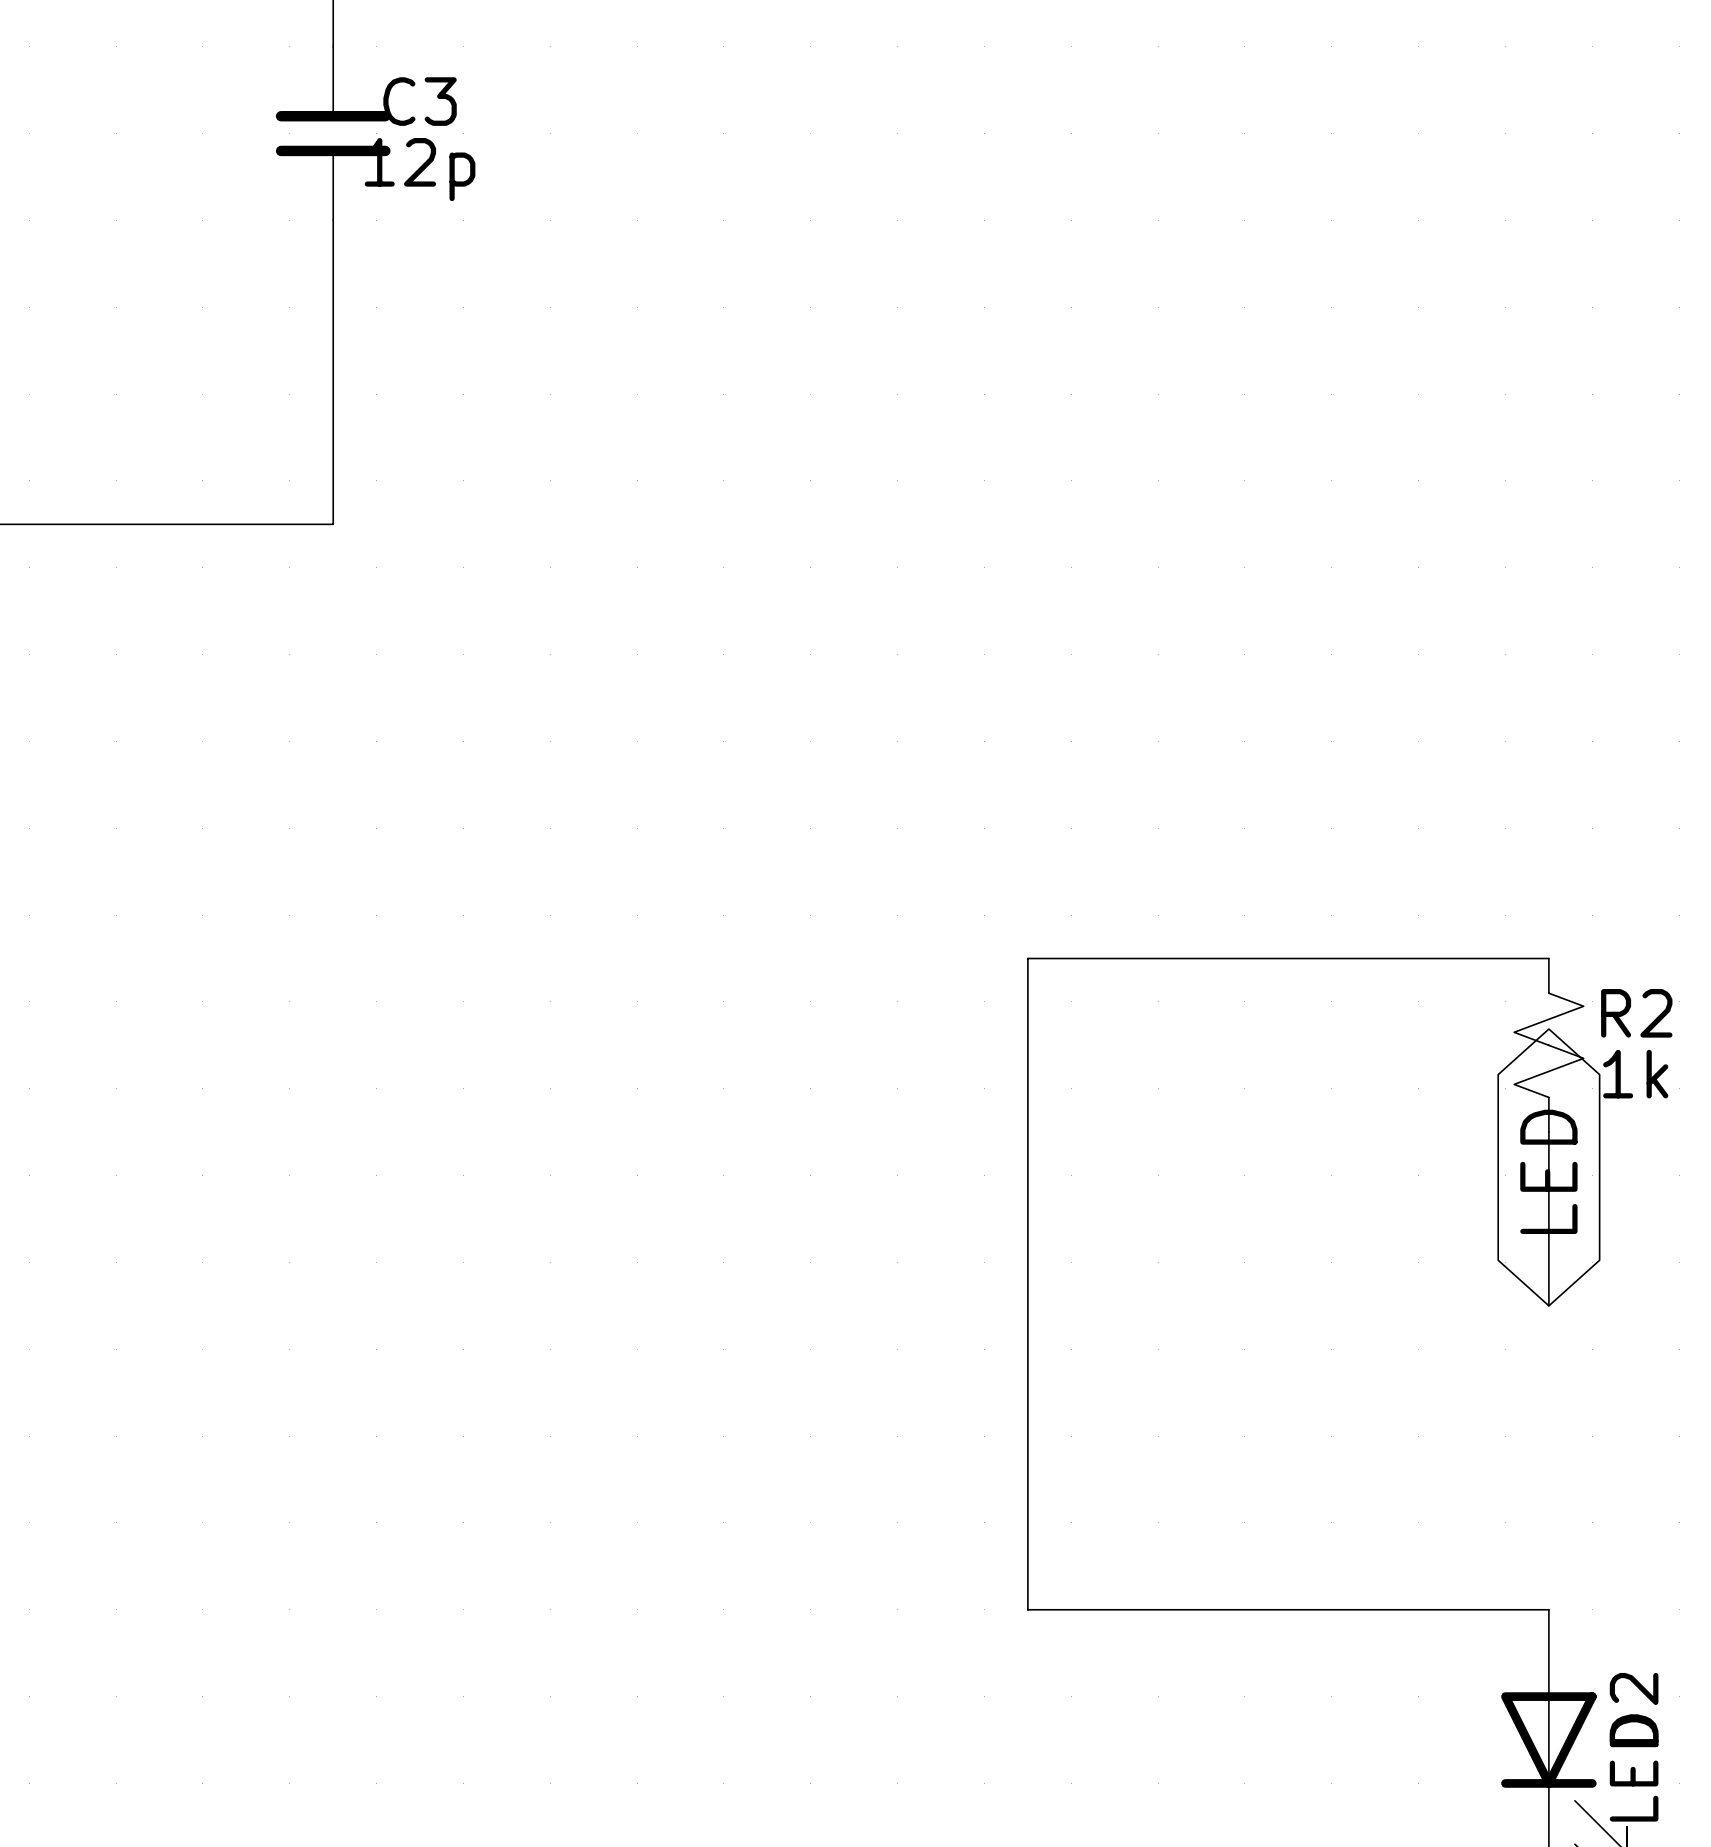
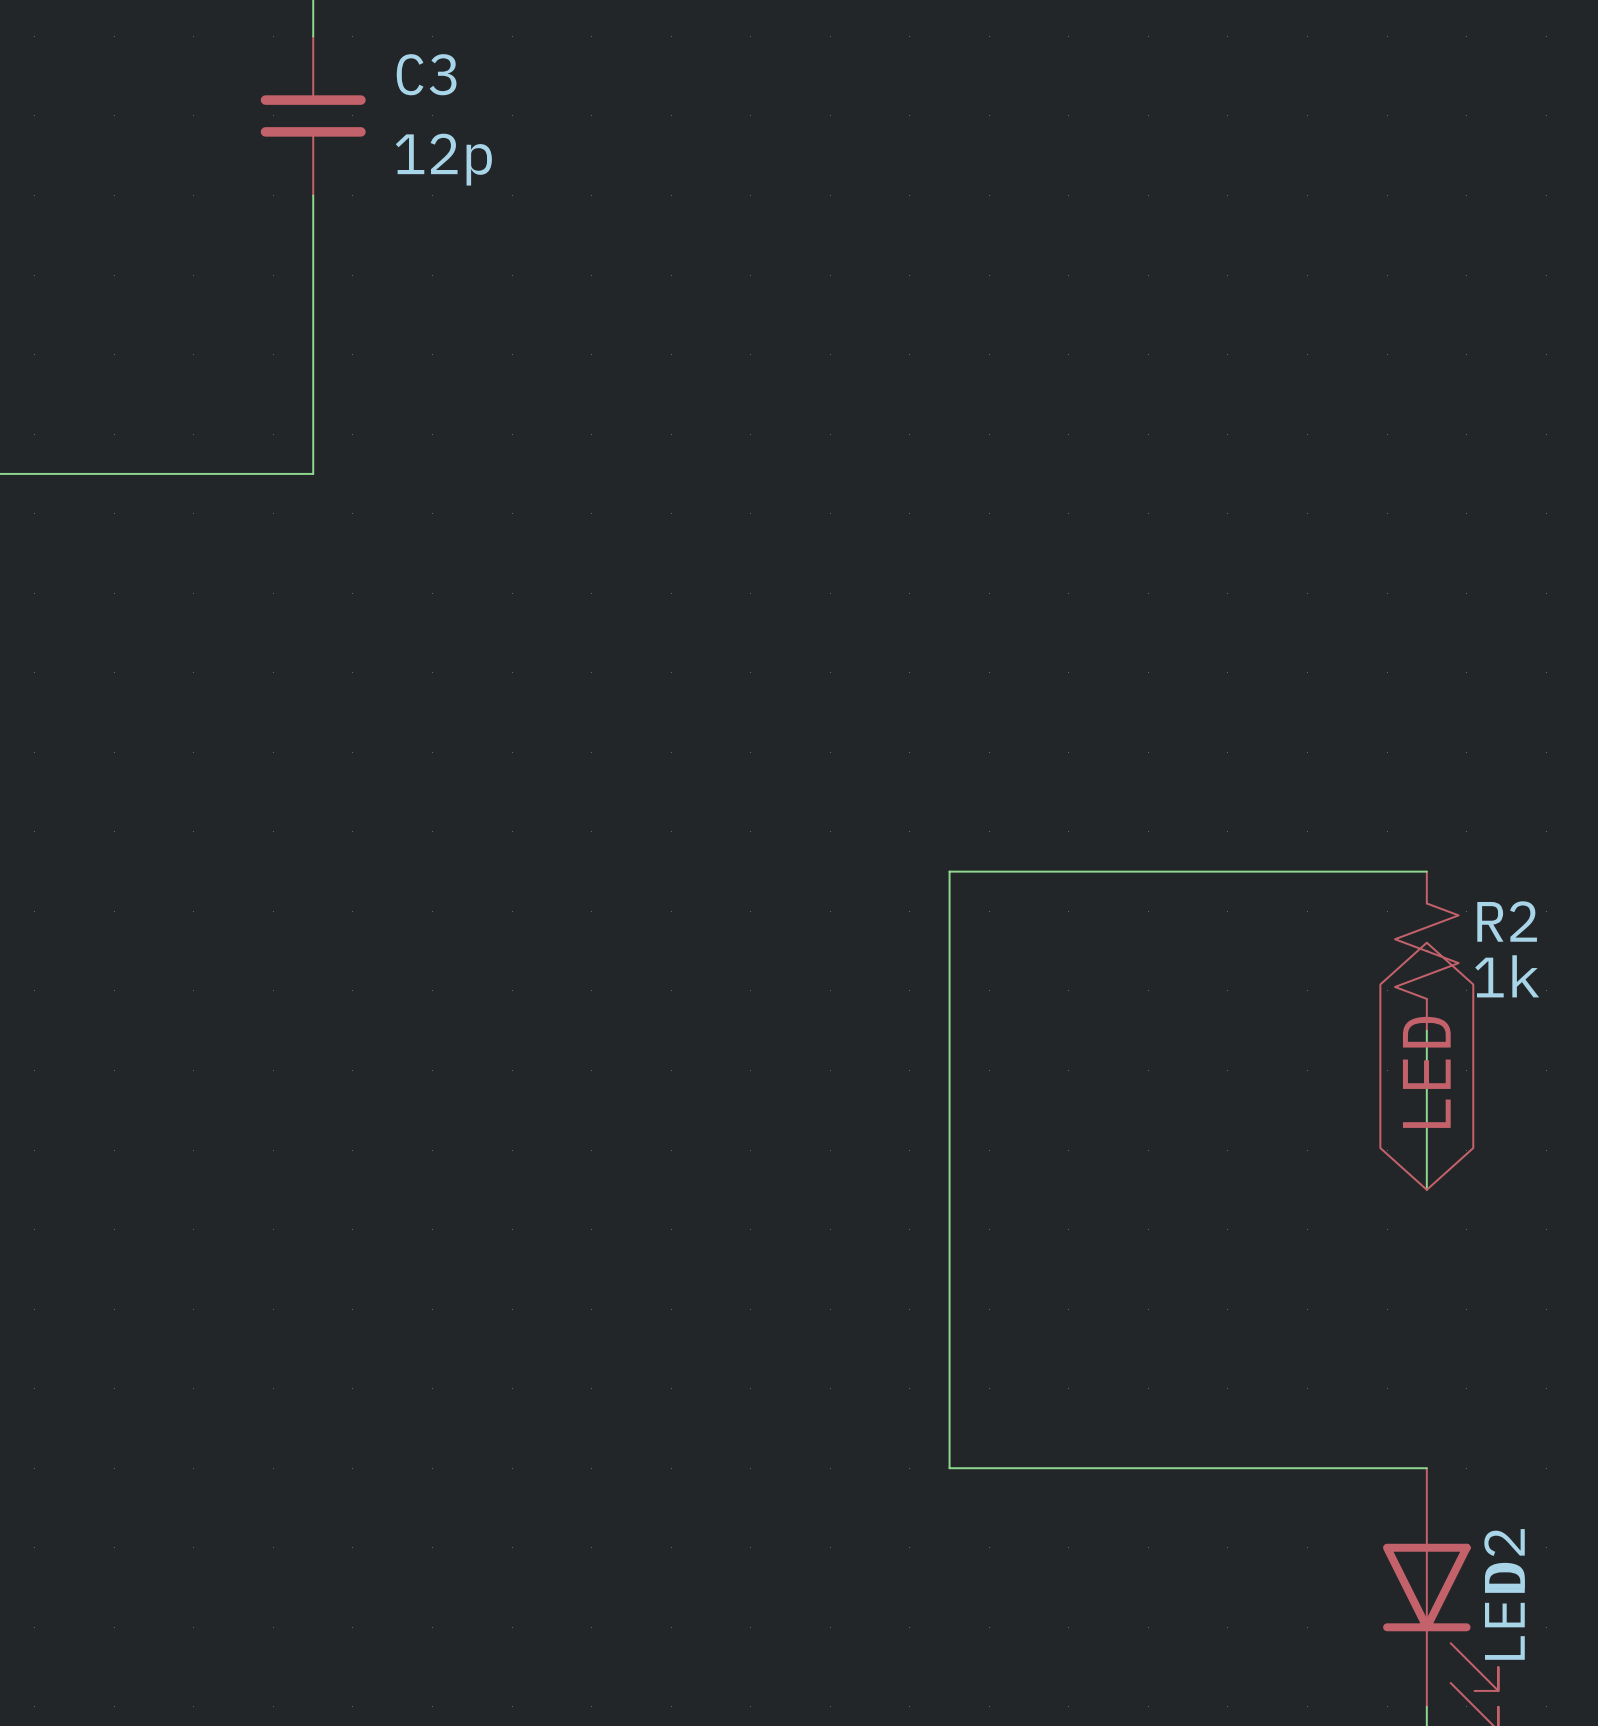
C3 name position: C3 (420, 101) -> C3 (426, 74)
C3 value position: 12p (420, 169) -> 12p (443, 159)

